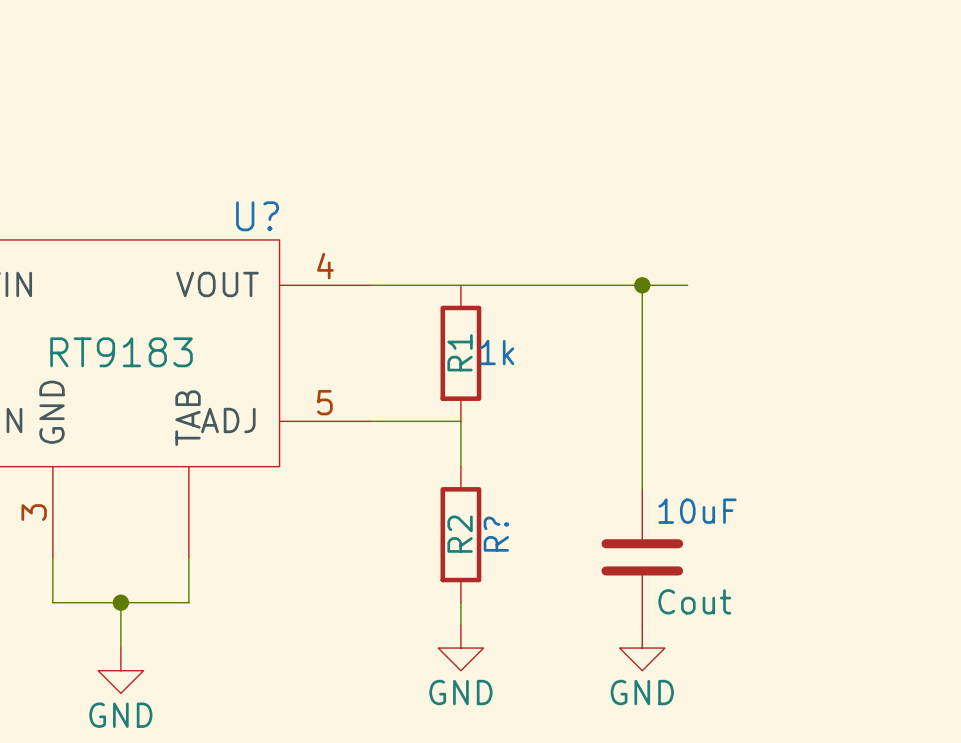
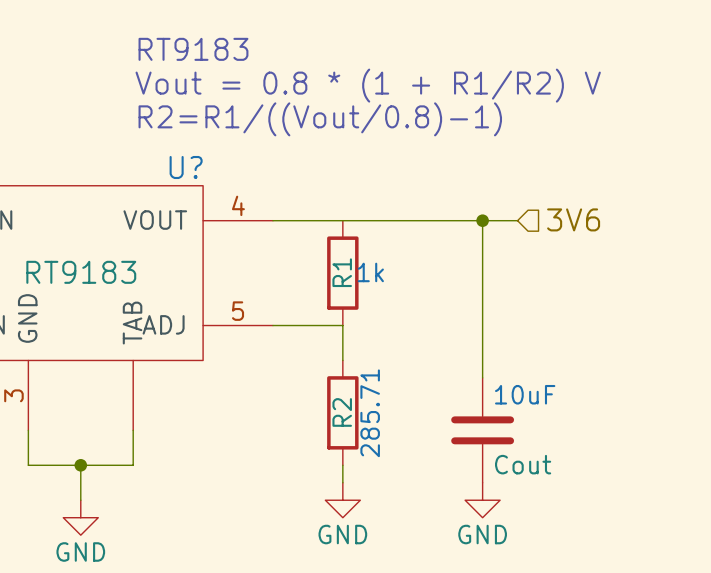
text: none -> RT9183 (193, 49)
text: none -> Vout = 0.8 * (1 + R1/R2) V (368, 85)
text: none -> R2=R1/((Vout/0.8)-1) (320, 119)
hierarchical label: none -> 3V6 (573, 219)
R? name: R? (496, 534) -> 285.71 (370, 413)

